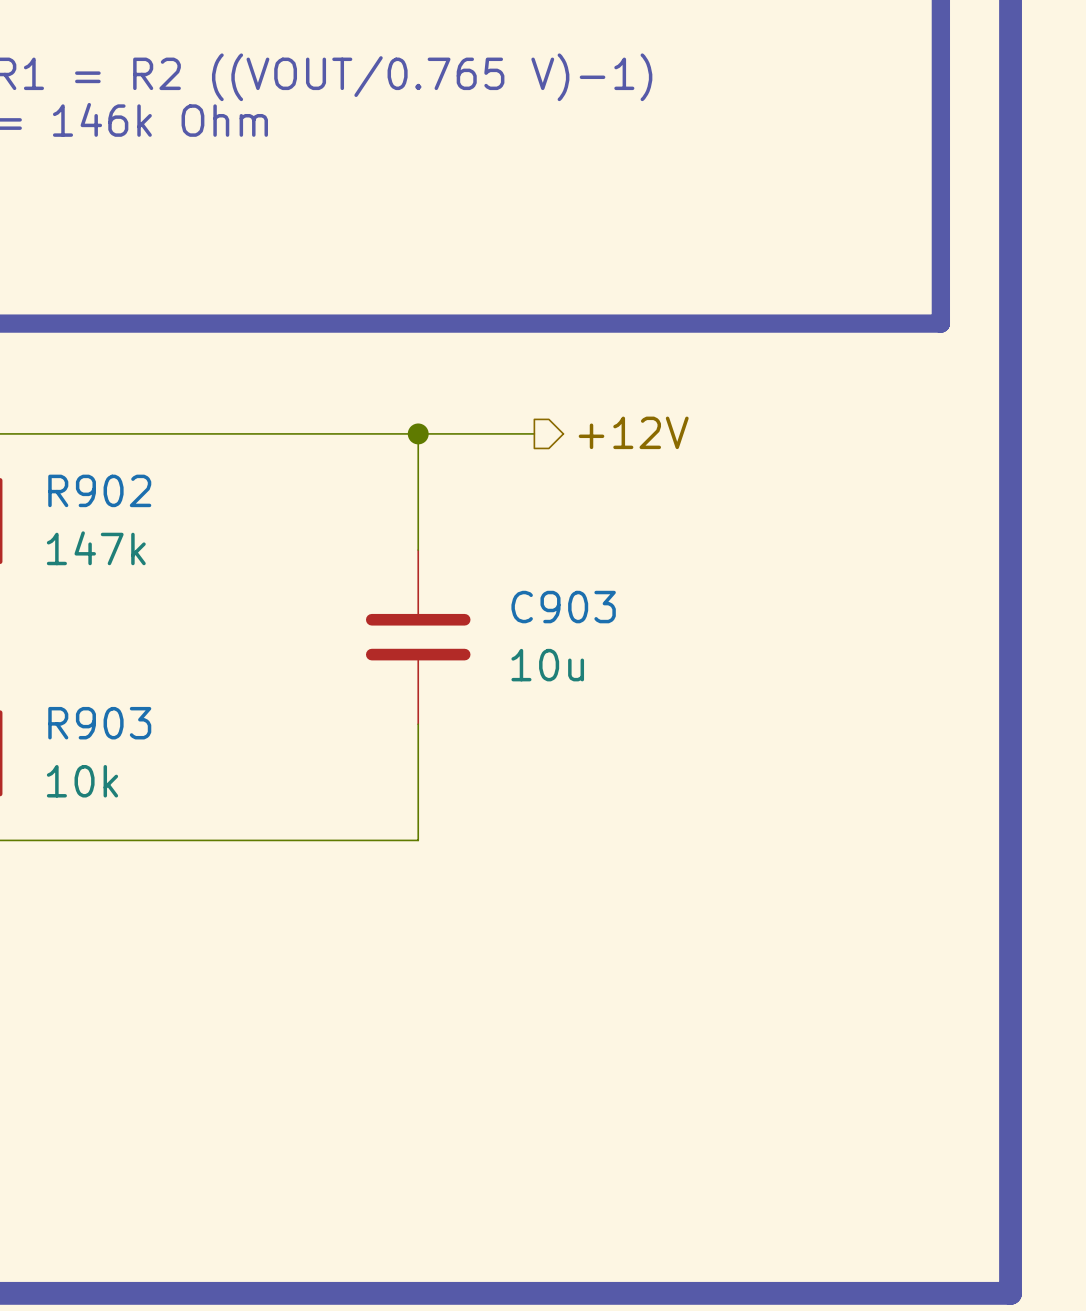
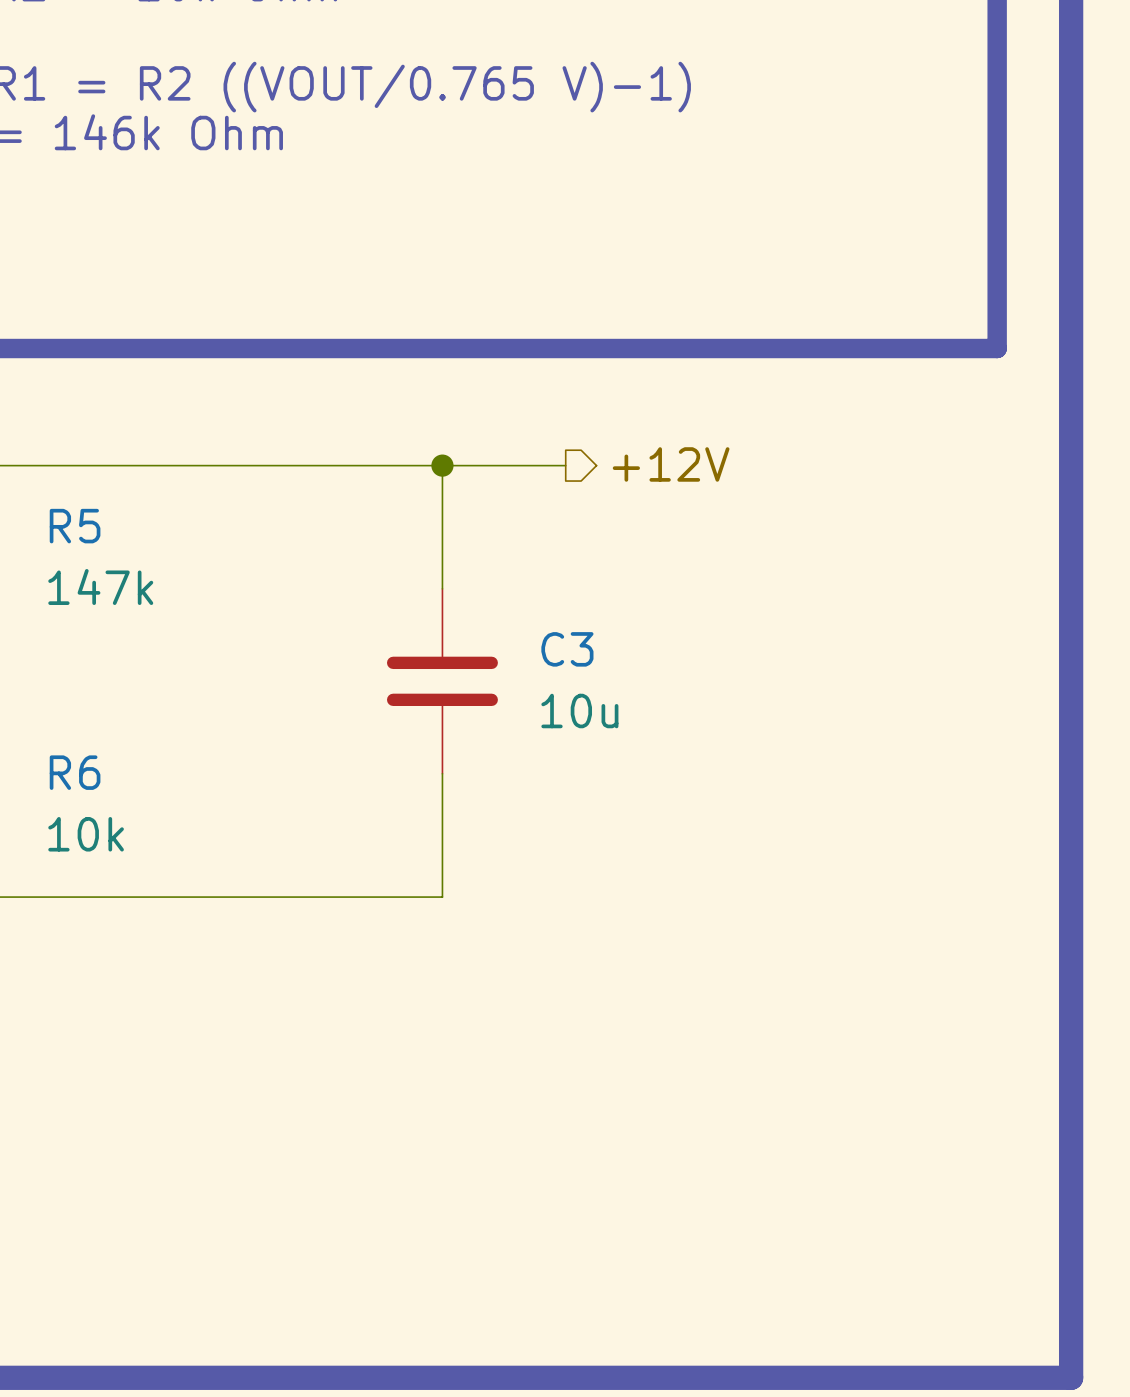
R902 name: R902 (99, 490) -> R5 (75, 526)
C903 name: C903 (563, 607) -> C3 (567, 649)
R903 name: R903 (99, 723) -> R6 (75, 772)

